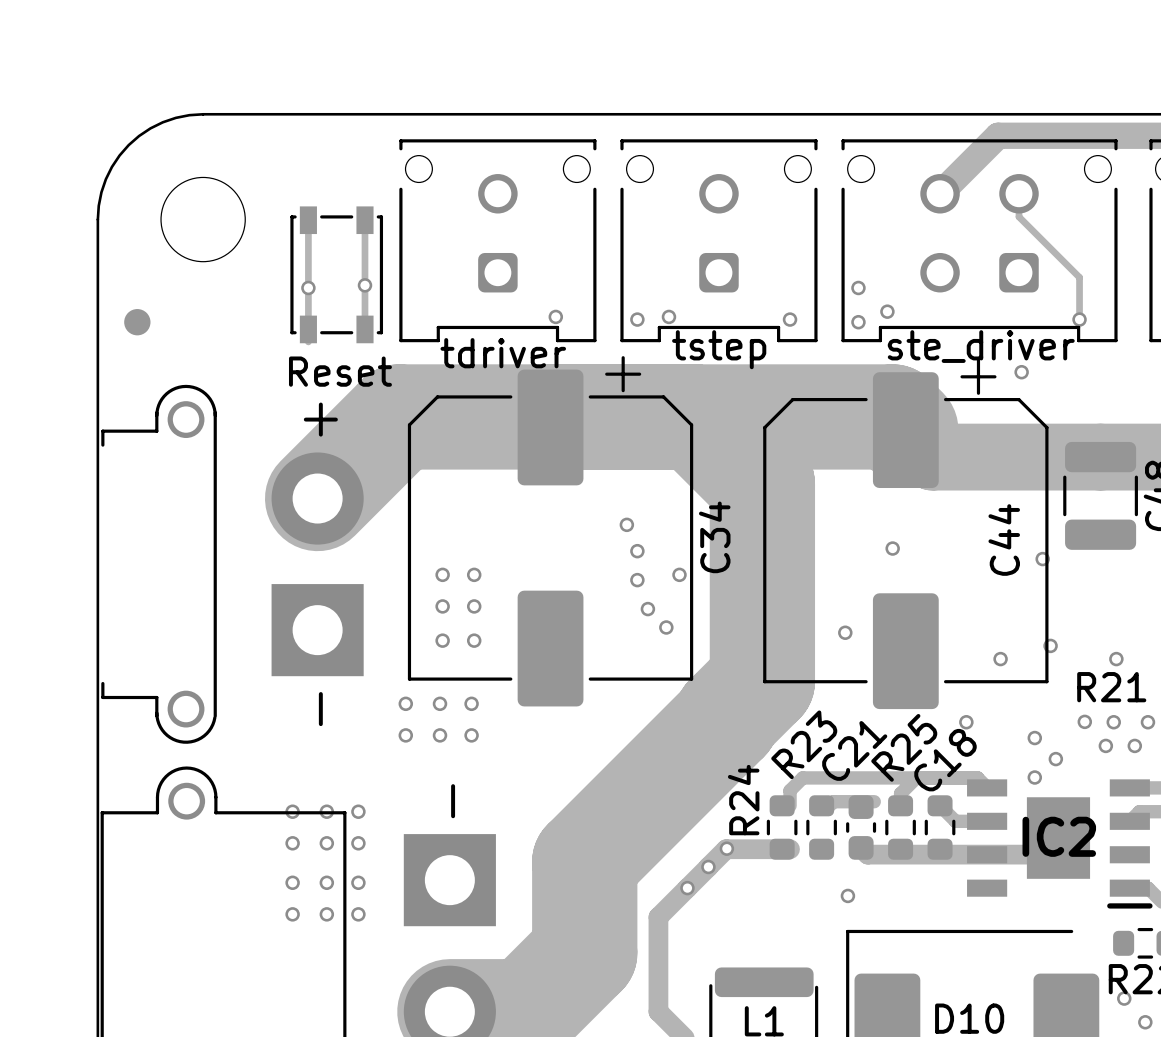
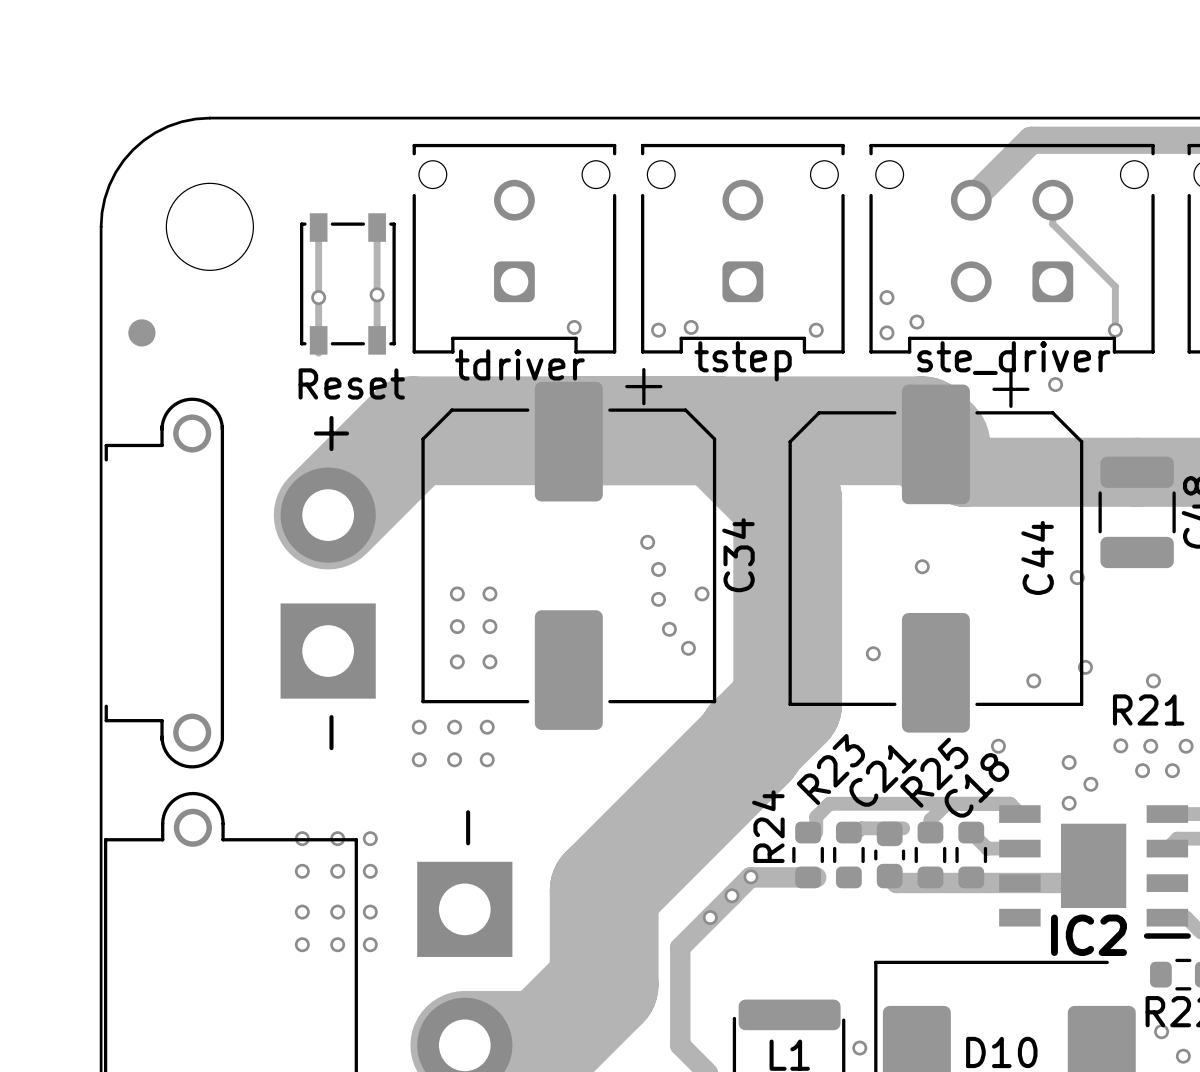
IC2 name position: IC2 (1059, 836) -> IC2 (1089, 935)
via position: (847, 895) -> (859, 1048)

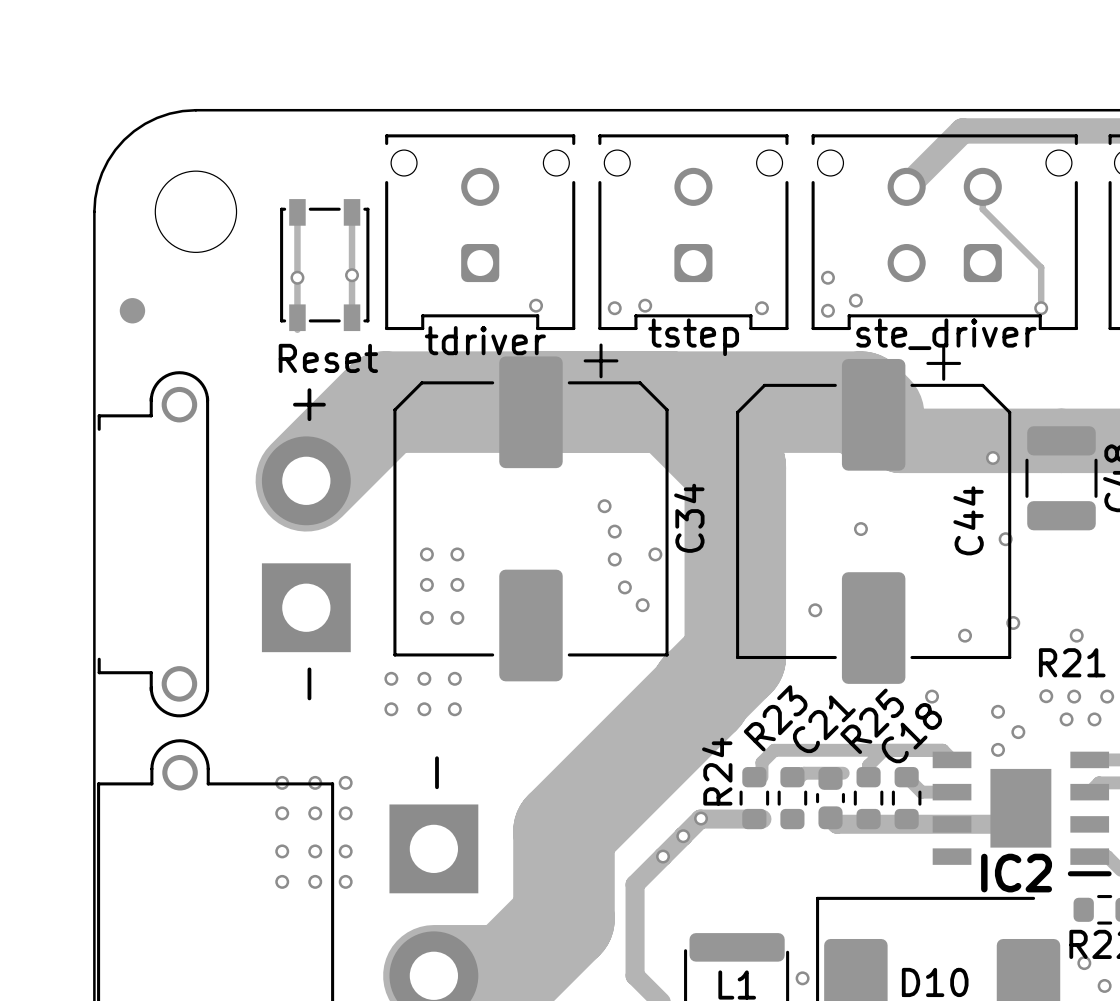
via position: (1055, 384) -> (992, 457)

